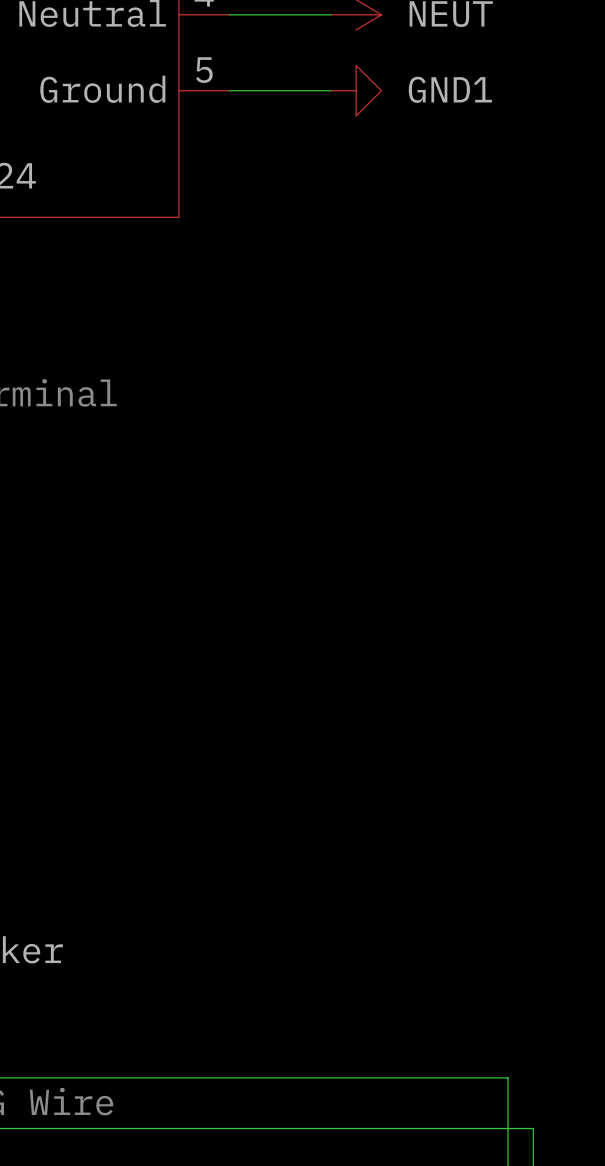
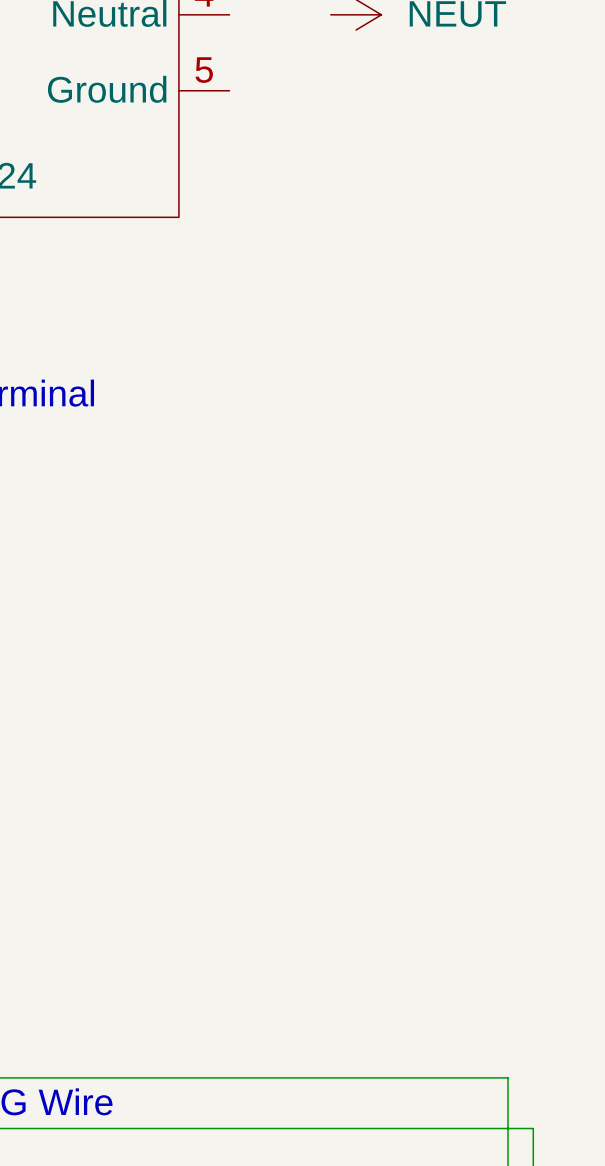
wire: (229, 14) (330, 14) -> none
wire: (229, 90) (330, 90) -> none
power symbol: GND1 (356, 90) -> none

